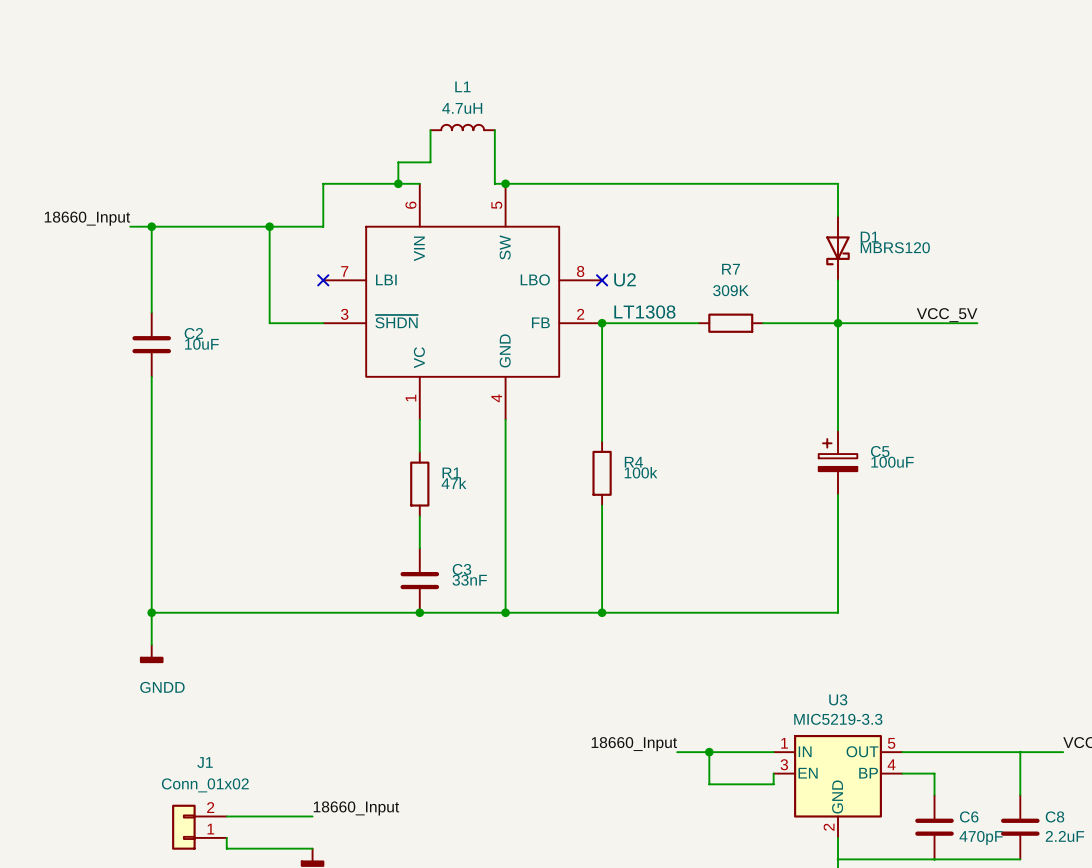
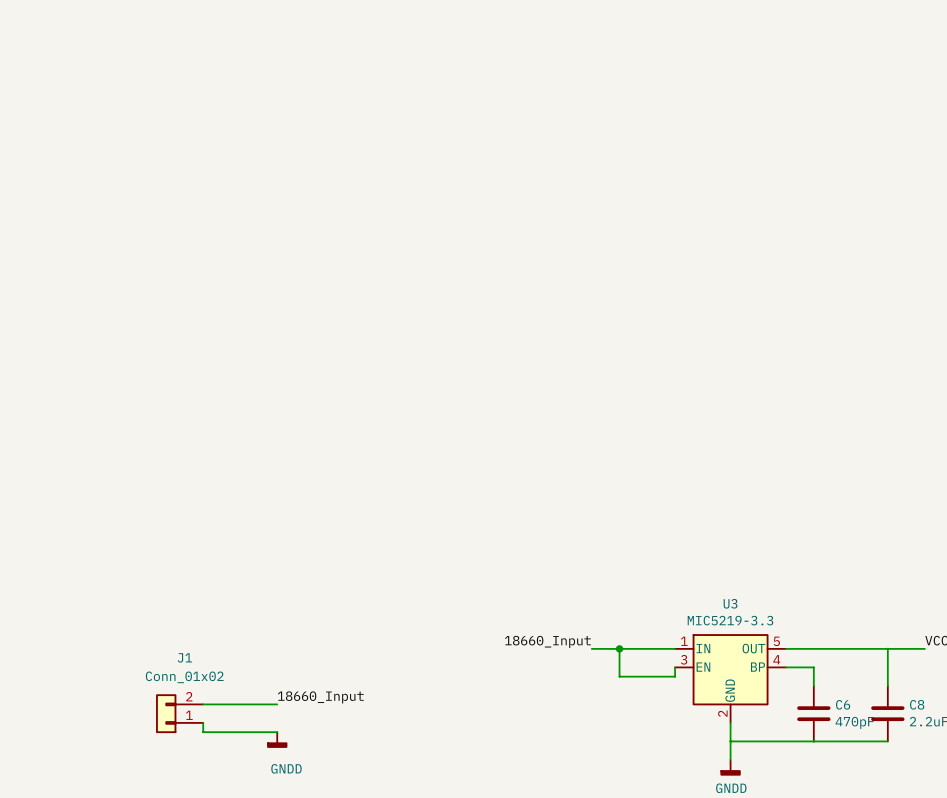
L1: 4.7uH (462, 127) -> none
wire: (430, 130) (430, 162) (398, 162) (398, 183) -> none
wire: (494, 130) (494, 183) (838, 183) (838, 215) -> none
junction: (398, 183) -> none
wire: (419, 183) (323, 183) (323, 226) (130, 226) -> none
junction: (505, 183) -> none
label: 18660_Input (87, 218) -> none
wire: (151, 226) (151, 312) -> none
junction: (151, 226) -> none
wire: (269, 226) (269, 323) (323, 323) -> none
junction: (269, 226) -> none
D1: MBRS120 (838, 248) -> none
no-connect mark: (323, 280) -> none
no-connect mark: (602, 280) -> none
wire: (838, 280) (838, 430) -> none
U2: LT1308 (462, 301) -> none
label: VCC_5V (947, 315) -> none
junction: (602, 323) -> none
wire: (698, 323) (602, 323) (602, 441) -> none
R7: 309K (730, 323) -> none
wire: (762, 323) (977, 323) -> none
junction: (838, 323) -> none
C2: 10uF (151, 344) -> none
wire: (151, 376) (151, 644) -> none
wire: (419, 419) (419, 451) -> none
wire: (505, 419) (505, 612) -> none
C5: 100uF (838, 462) -> none
R4: 100k (602, 473) -> none
R1: 47k (419, 484) -> none
wire: (838, 494) (838, 612) (151, 612) -> none
wire: (602, 505) (602, 612) -> none
wire: (419, 516) (419, 548) -> none
C3: 33nF (419, 580) -> none
junction: (151, 612) -> none
junction: (419, 612) -> none
junction: (505, 612) -> none
junction: (602, 612) -> none
power symbol: GNDD (151, 654) -> none

